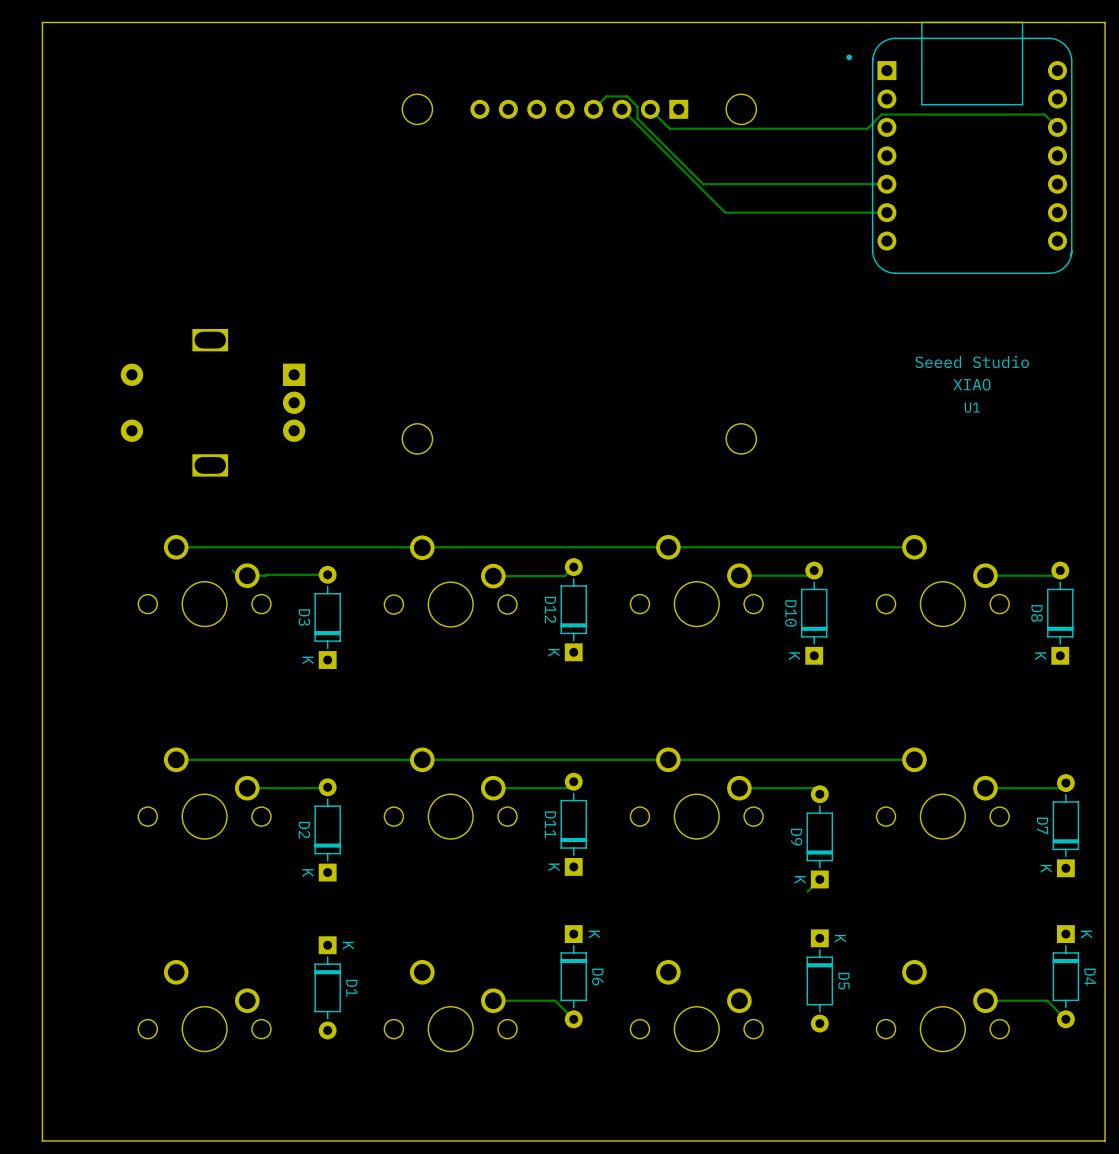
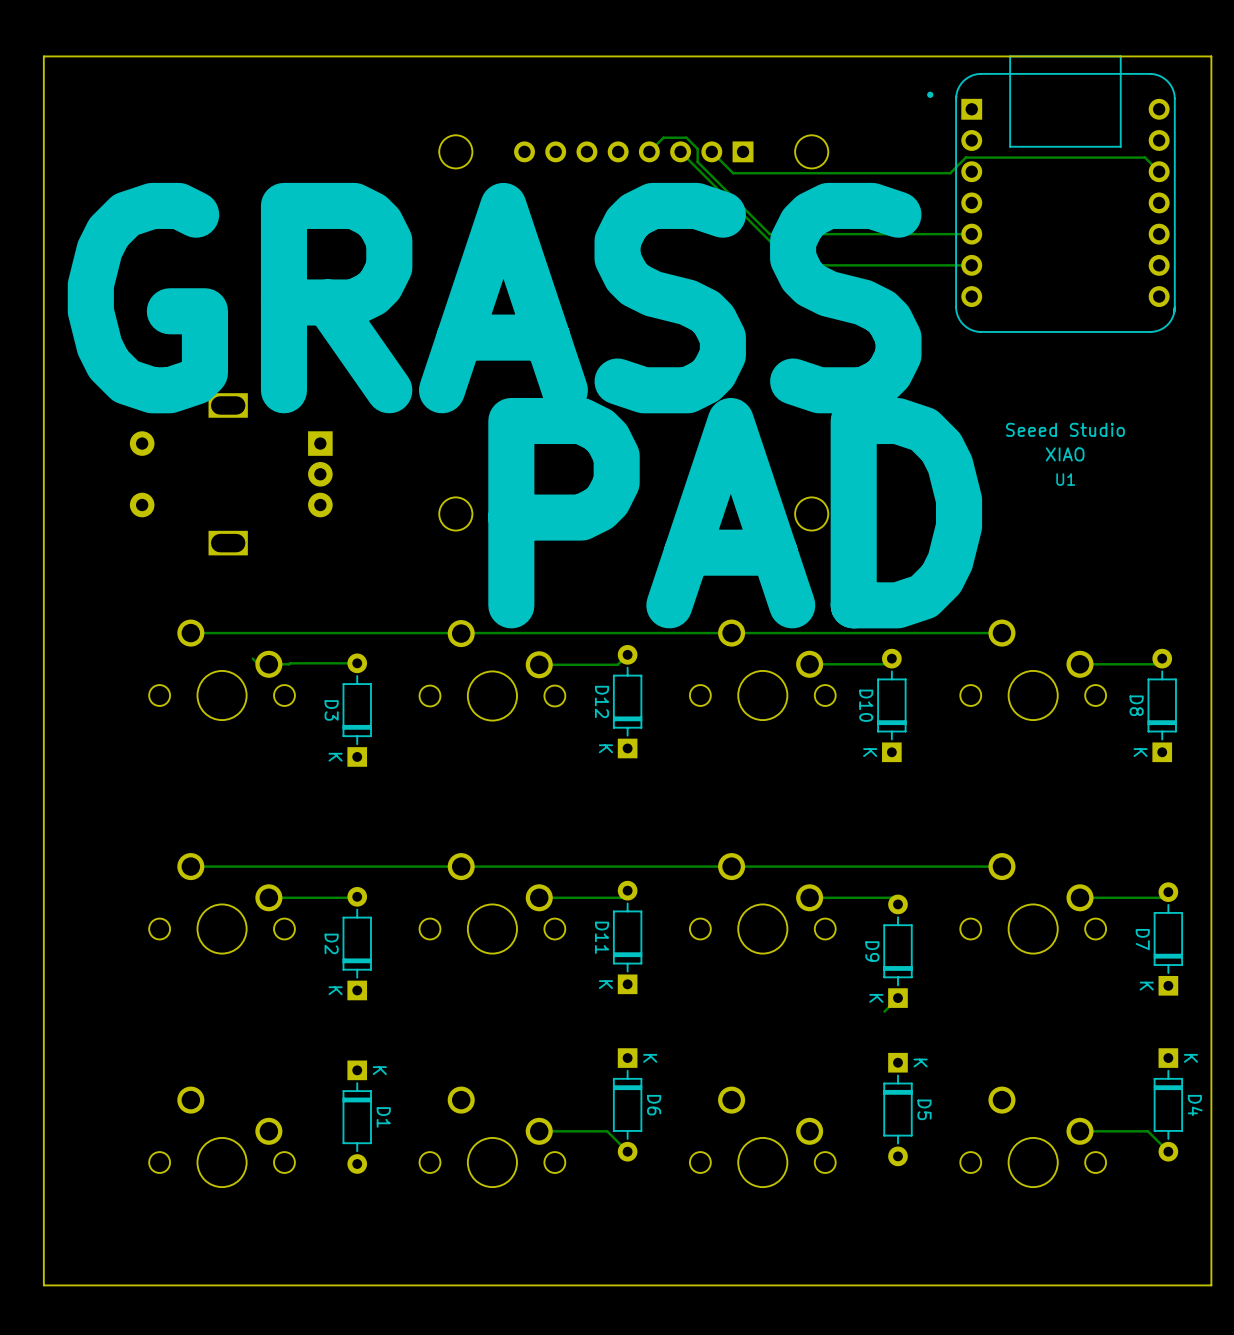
text: none -> GRASS (494, 298)
text: none -> PAD (735, 513)

